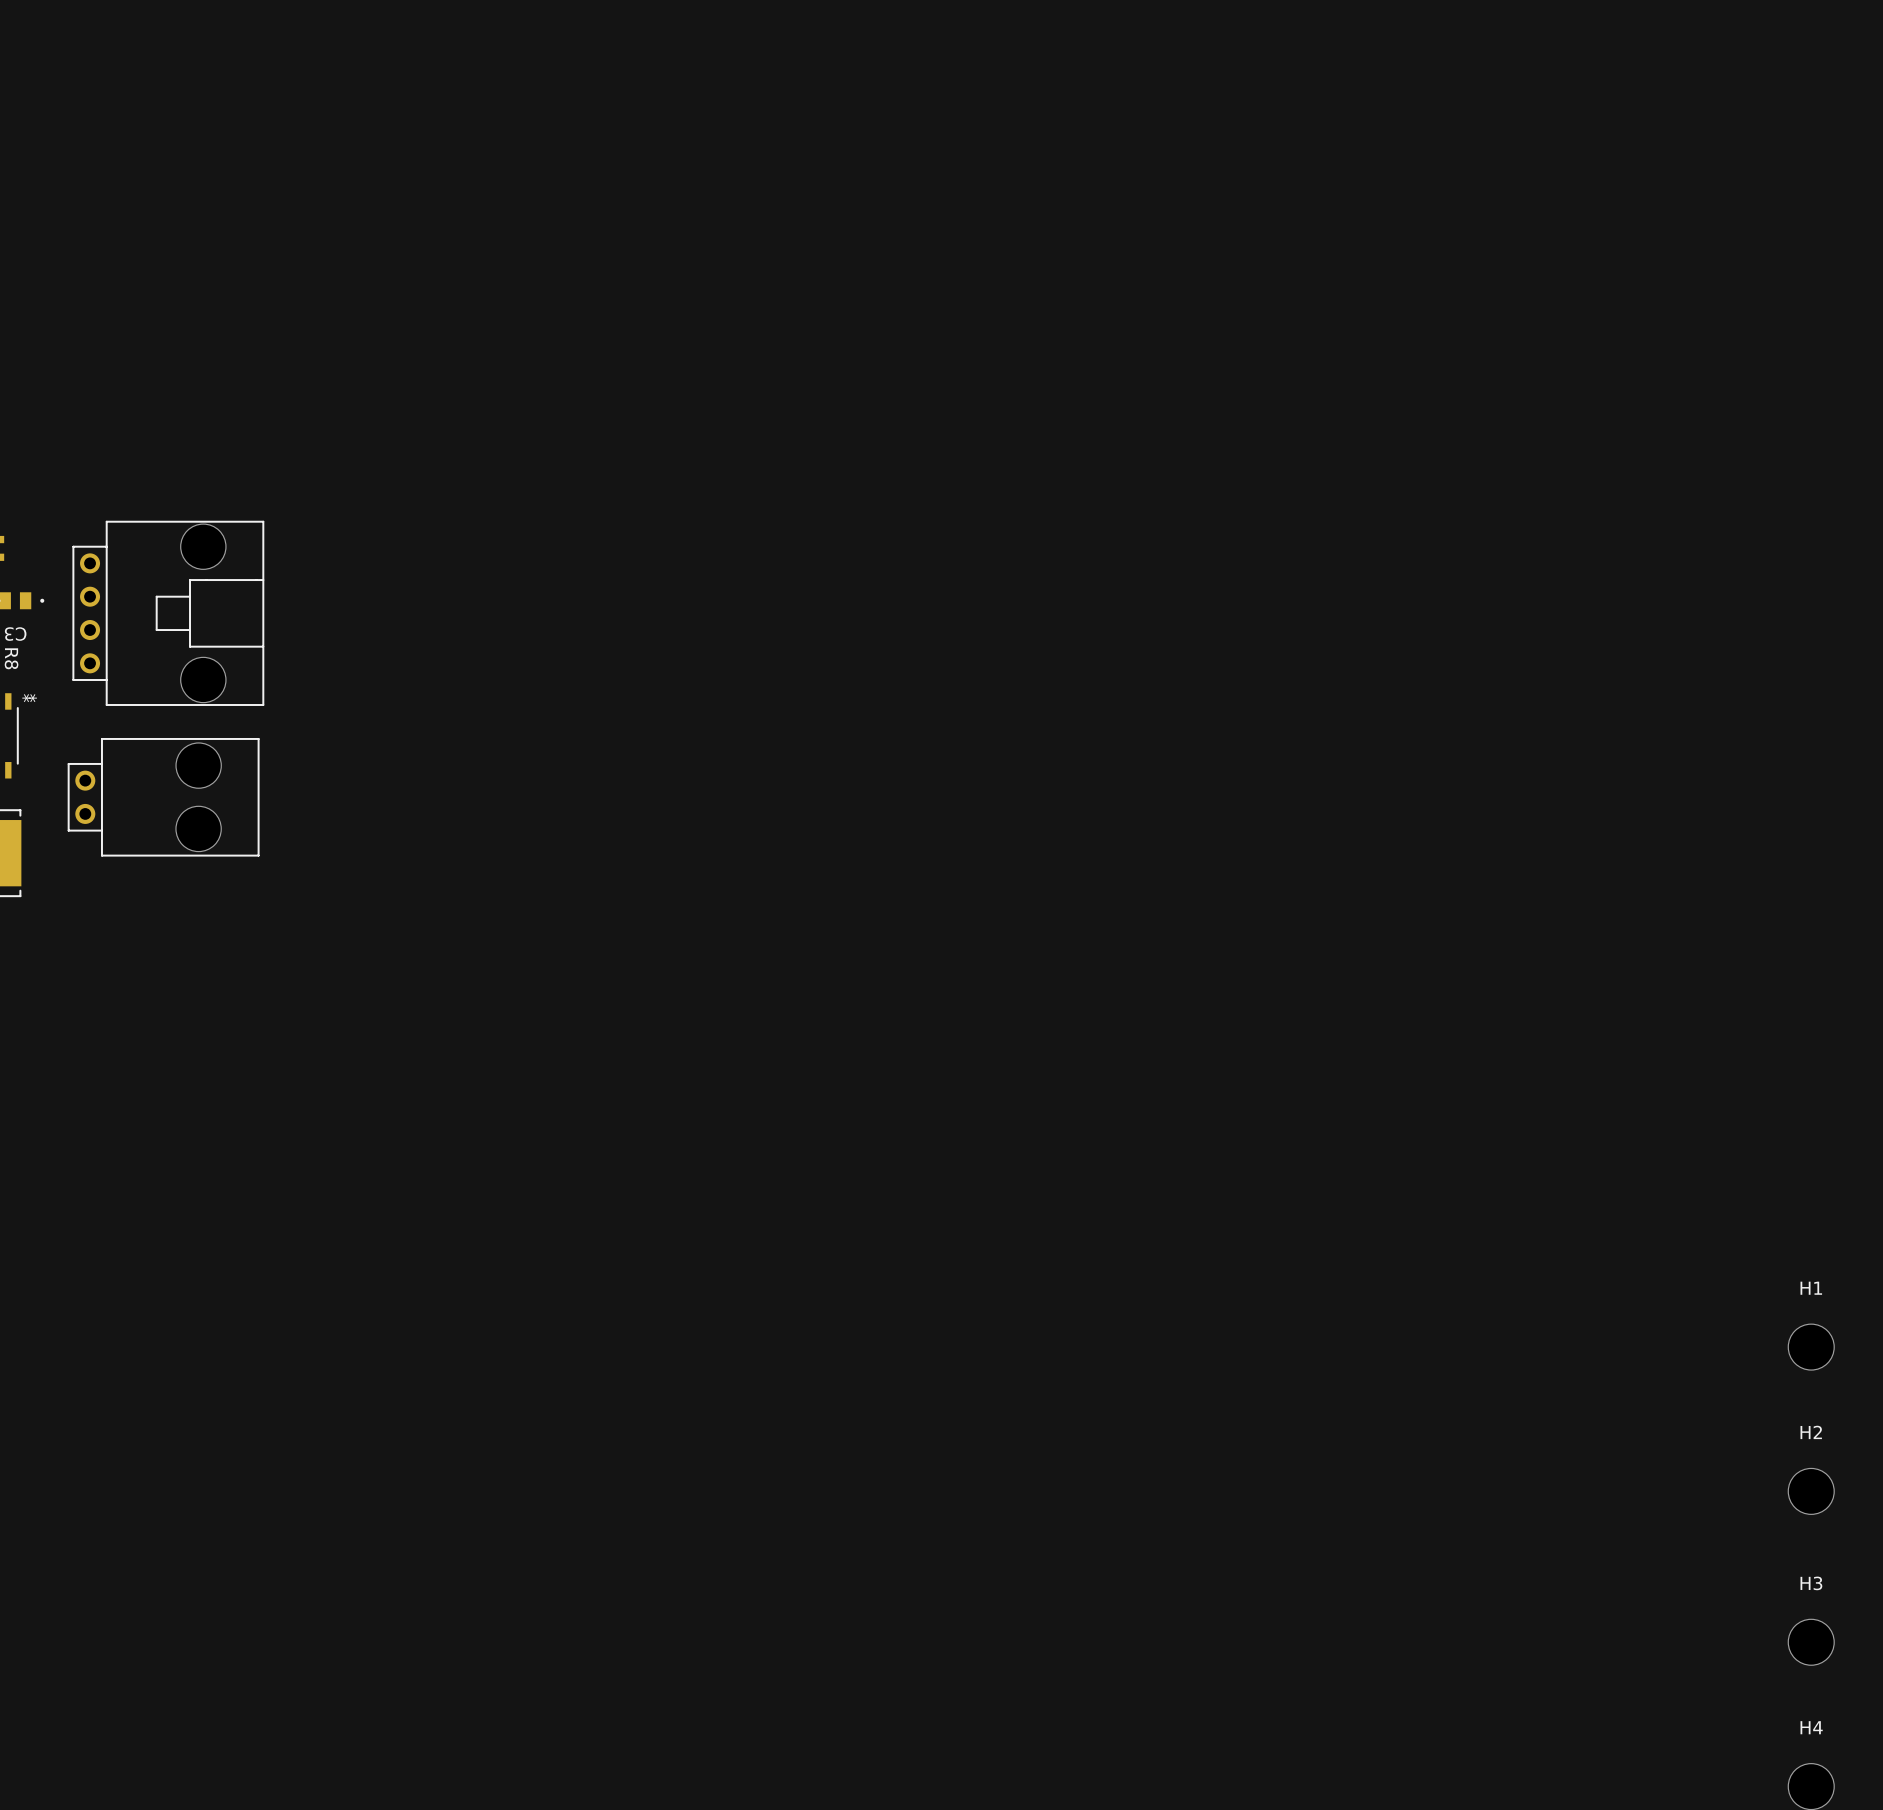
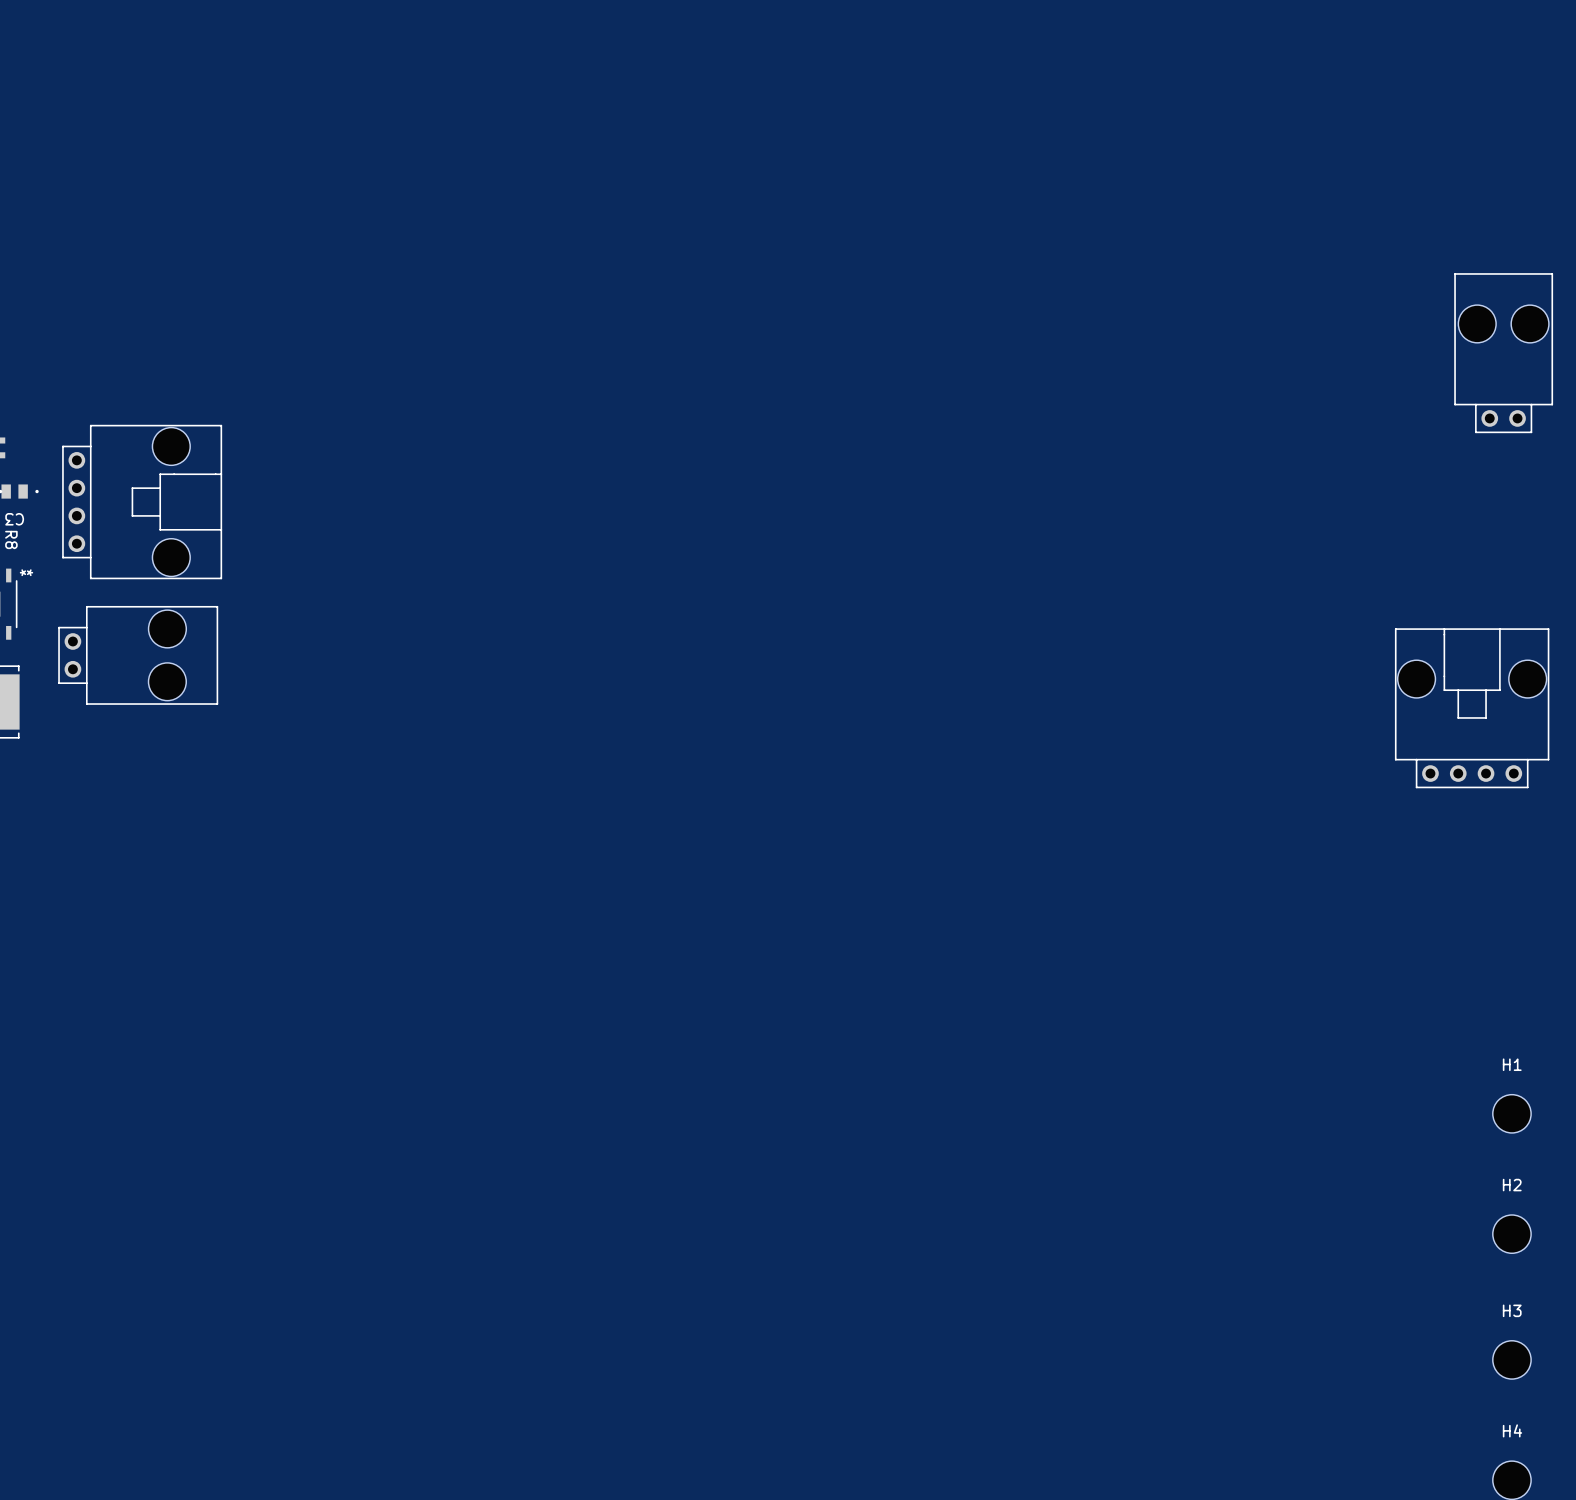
part: none -> (1503, 353)
part: none -> (1472, 708)

